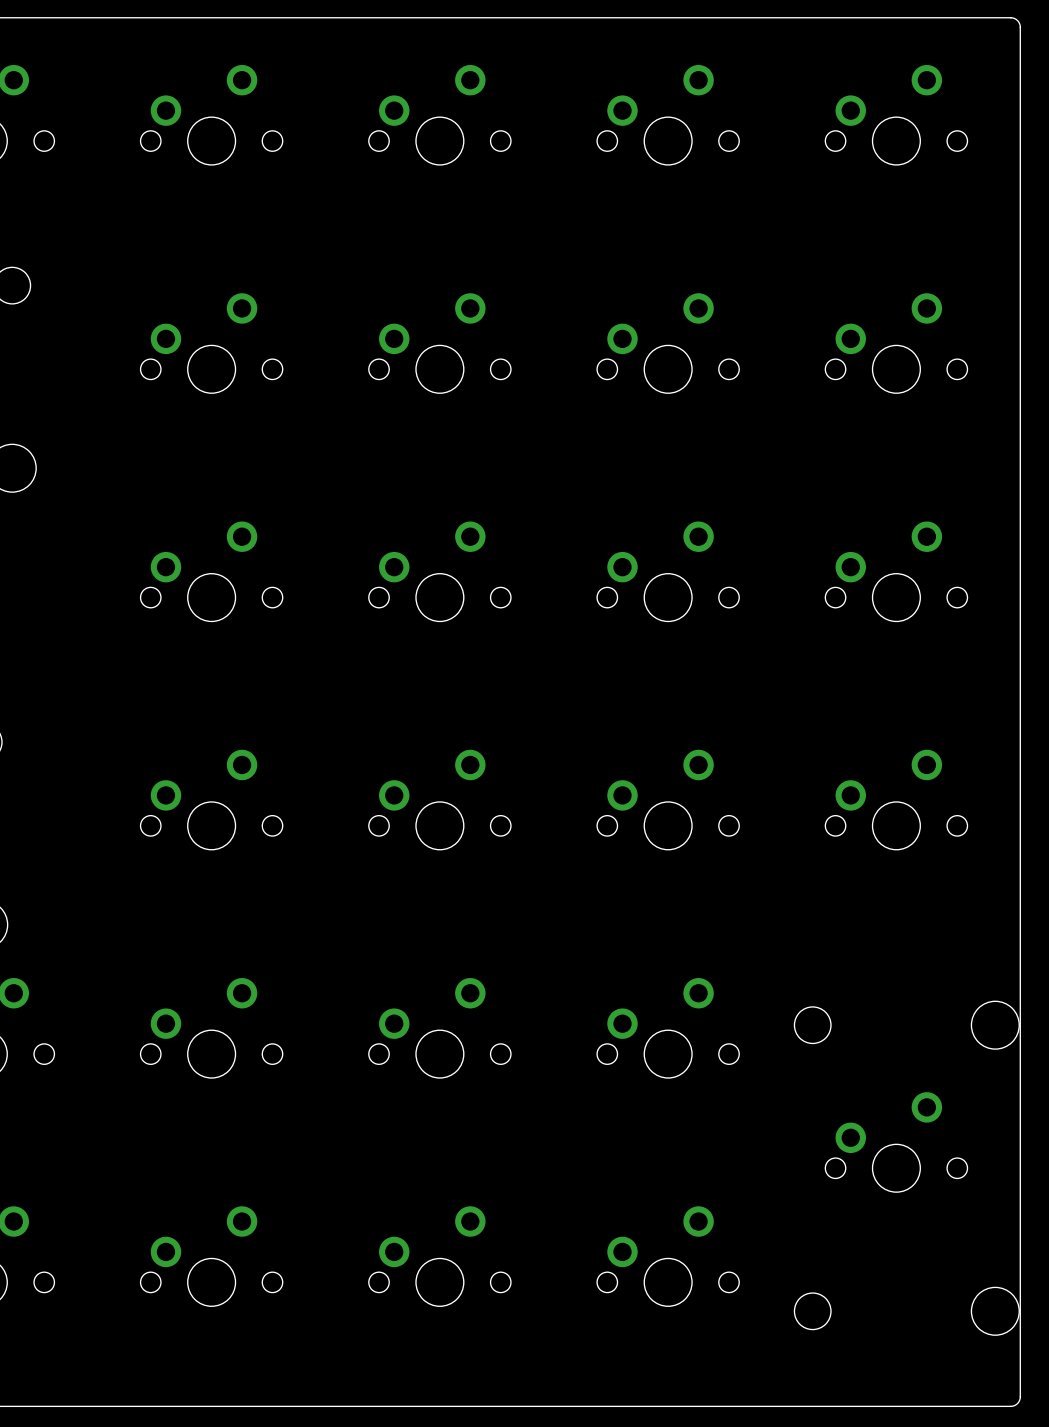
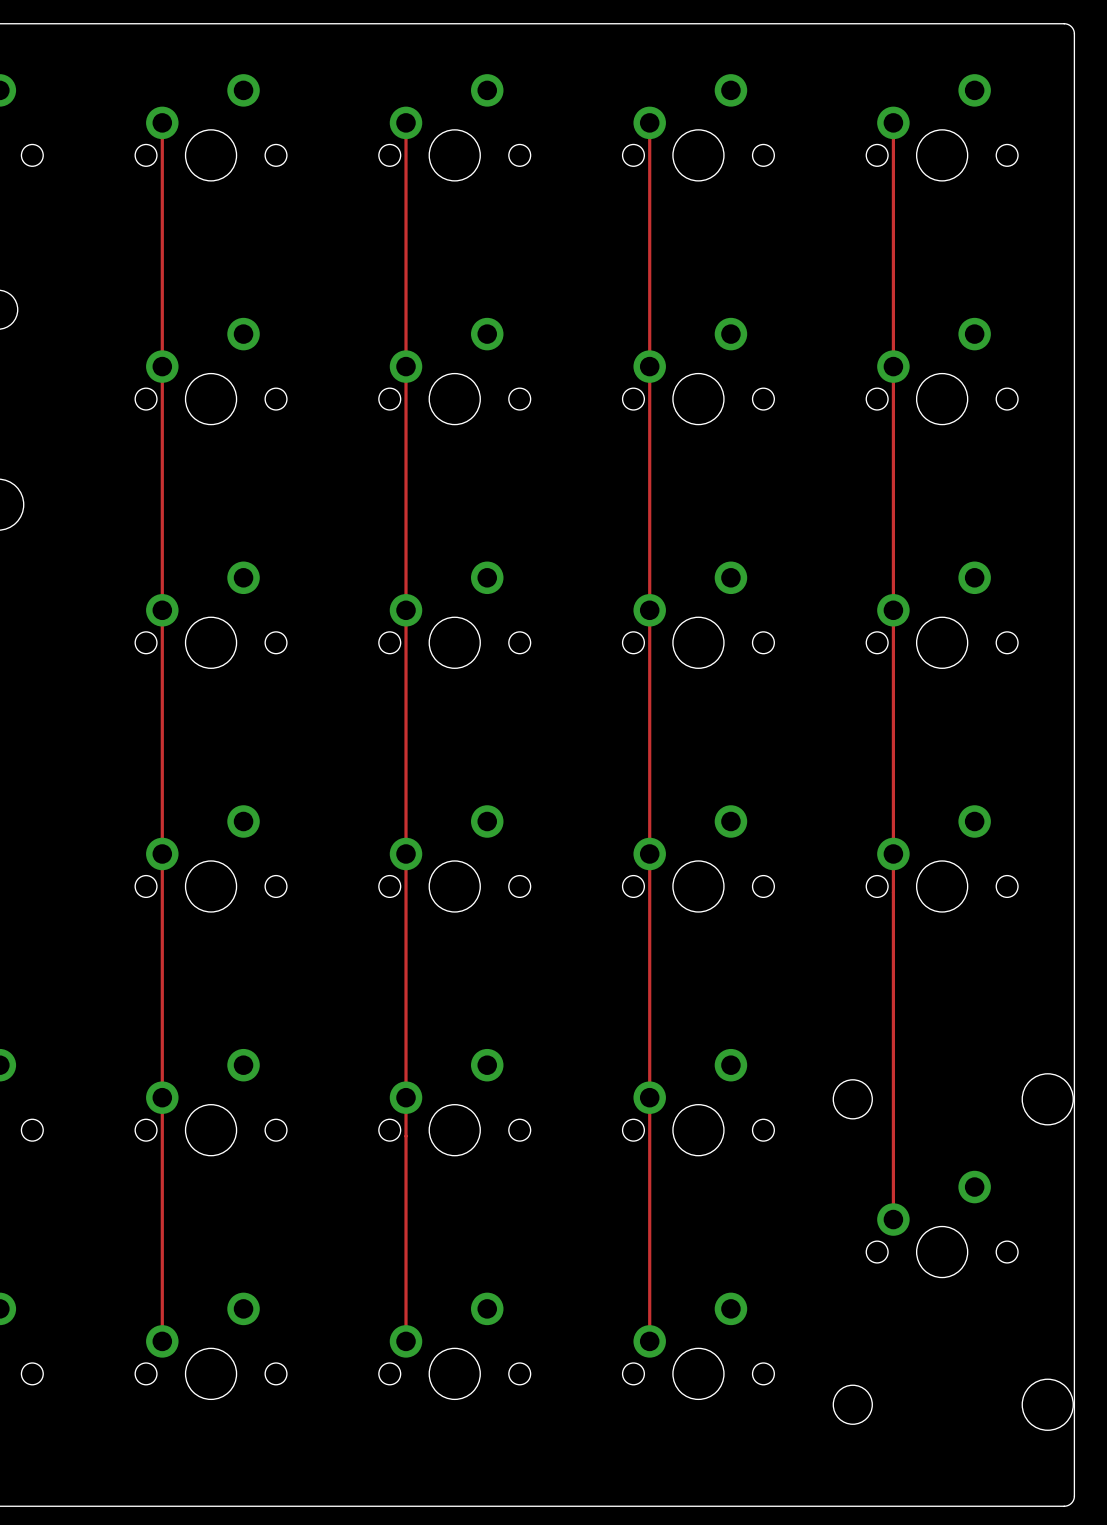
track: none -> (162, 122) (162, 1341)
track: none -> (406, 122) (406, 1341)
track: none -> (649, 122) (649, 1341)
track: none -> (893, 122) (893, 1219)

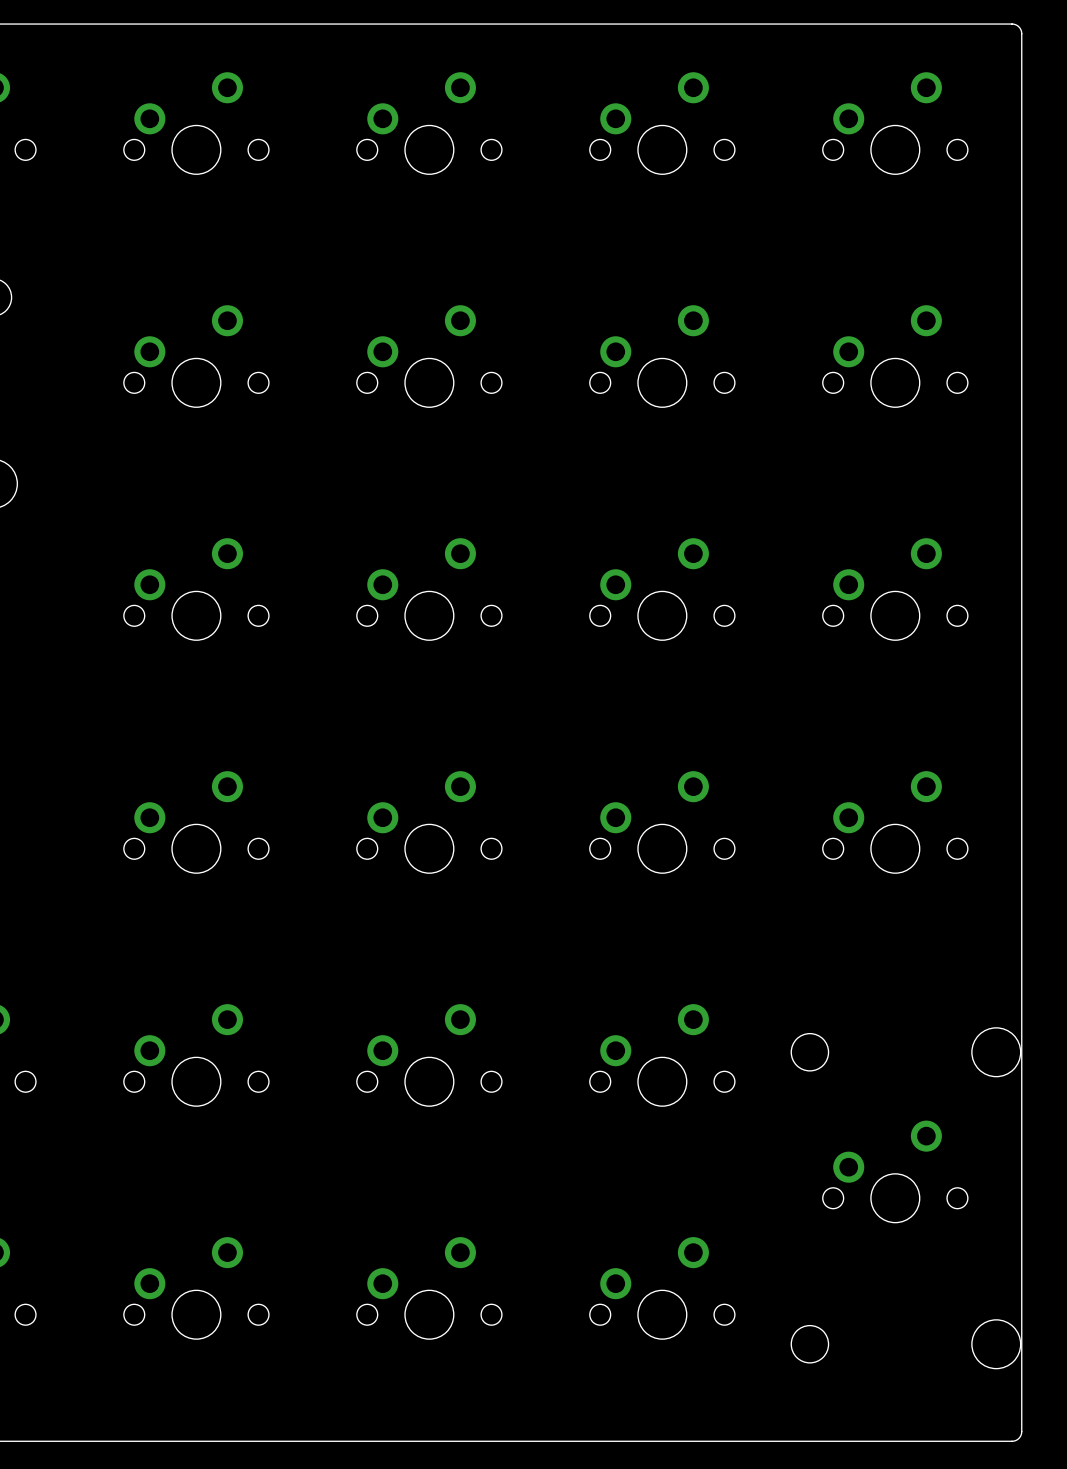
track: (162, 122) (162, 1341) -> none
track: (406, 122) (406, 1341) -> none
track: (649, 122) (649, 1341) -> none
track: (893, 122) (893, 1219) -> none

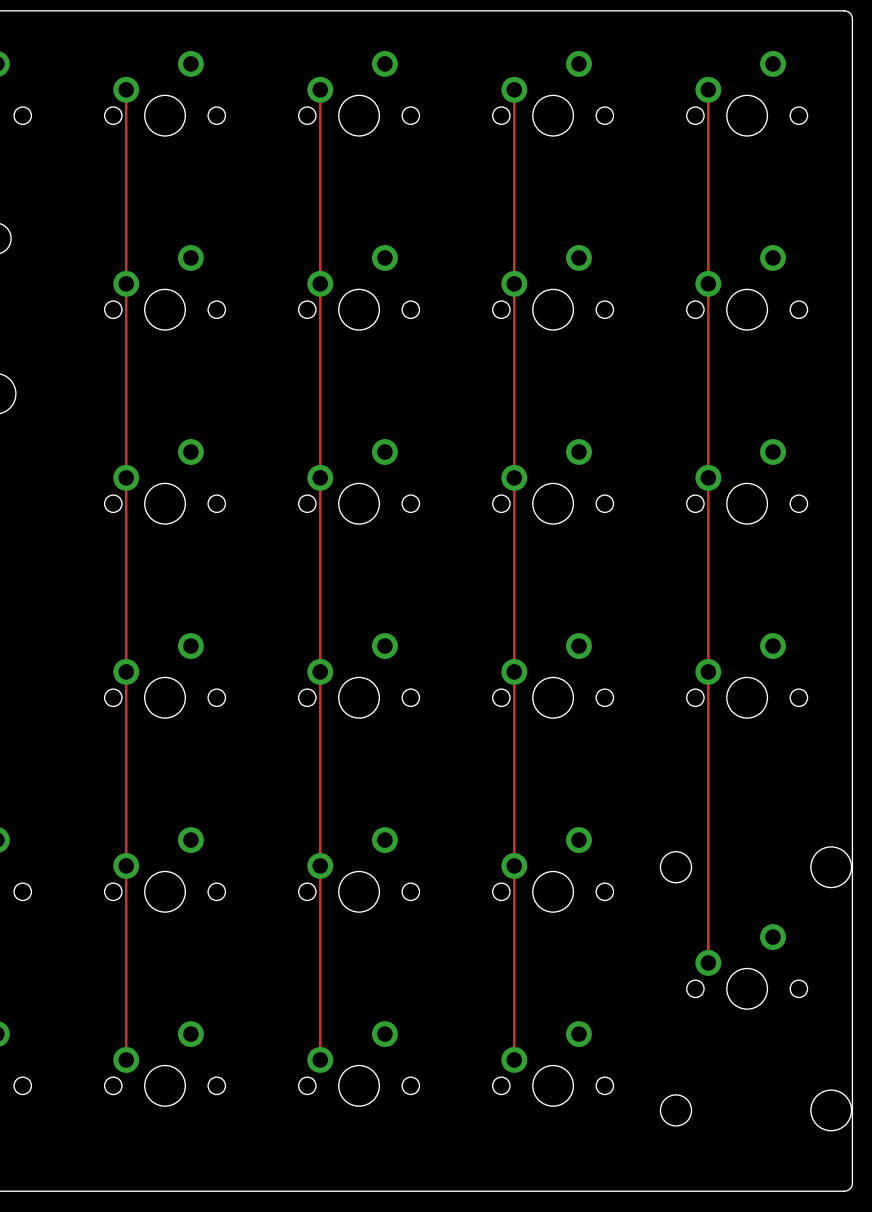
track: none -> (126, 89) (126, 1059)
track: none -> (320, 89) (320, 1059)
track: none -> (514, 89) (514, 1059)
track: none -> (708, 89) (708, 962)

